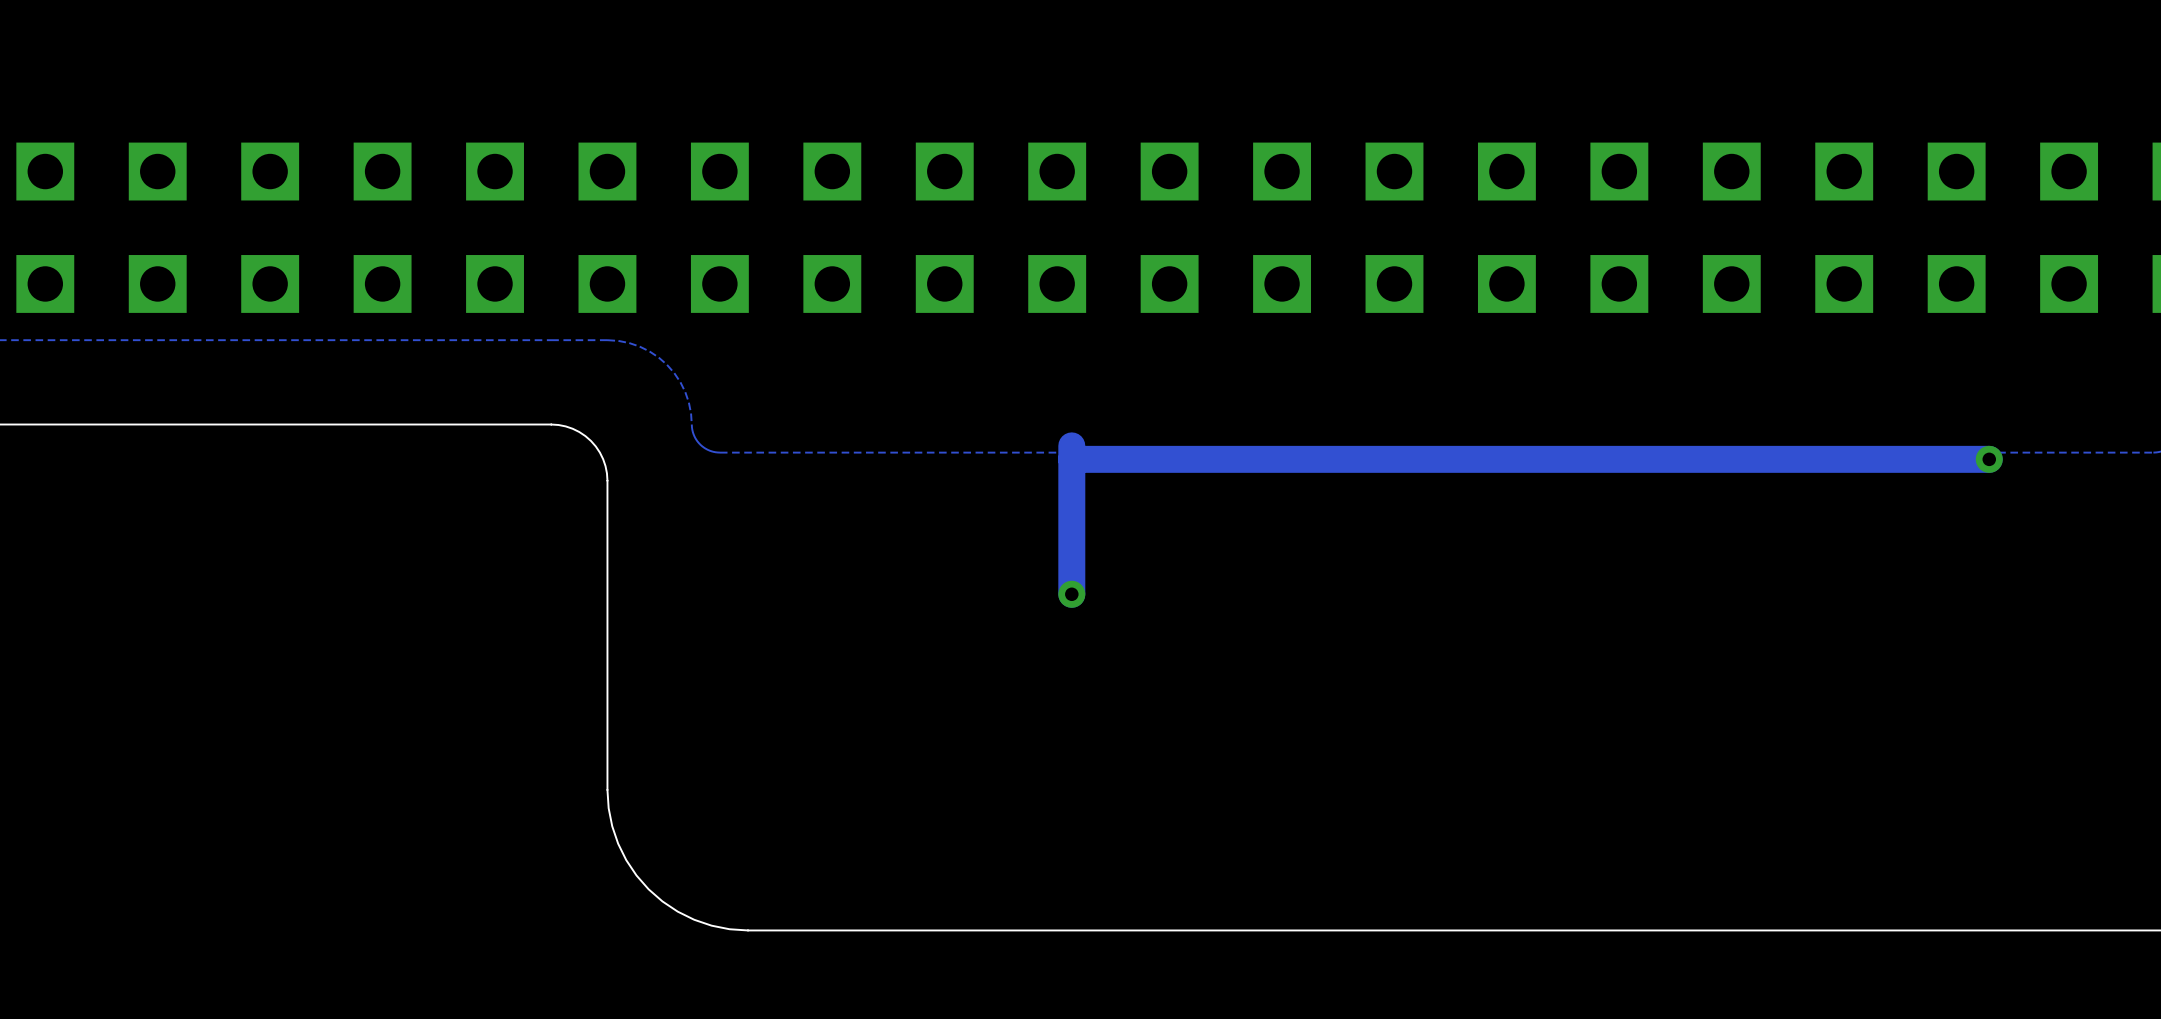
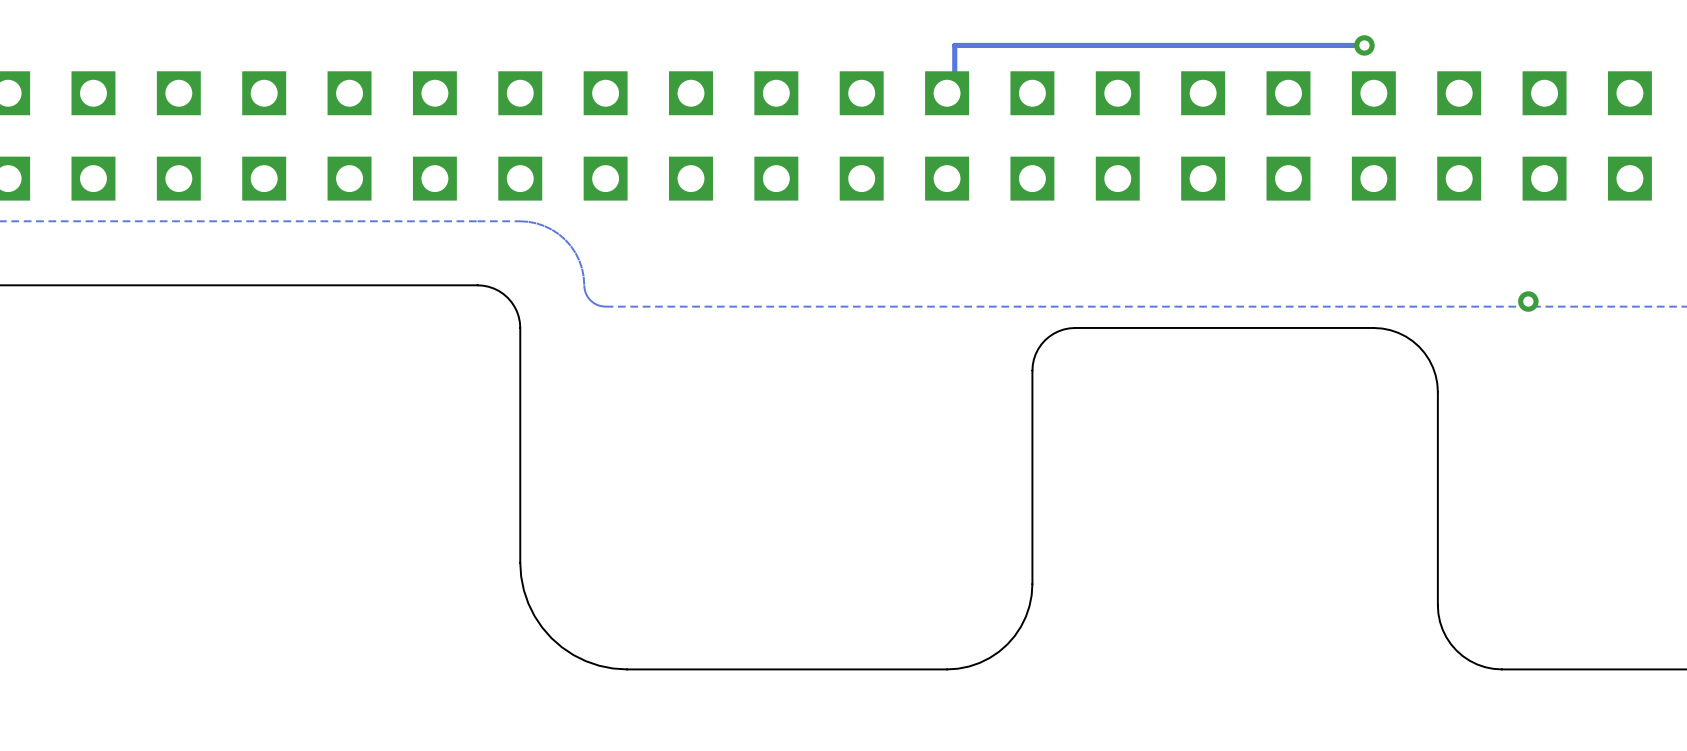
track: none -> (1364, 45) (954, 45) (954, 86) (947, 93)
via: none -> (1364, 45)
track: (1071, 445) (1071, 594) -> none
track: (1989, 459) (1071, 459) -> none
via position: (1989, 459) -> (1528, 301)
via: (1071, 594) -> none
board edge: (1900, 930) (1169, 930) -> (1501, 669) (1485, 667) (1469, 660) (1451, 644) (1442, 629) (1437, 605) (1437, 392) (1435, 375) (1429, 359) (1412, 341) (1390, 330) (1373, 327) (1075, 327) (1064, 329) (1049, 336) (1038, 349) (1032, 365) (1032, 584) (1029, 606) (1014, 636) (999, 651) (969, 666) (947, 669)

